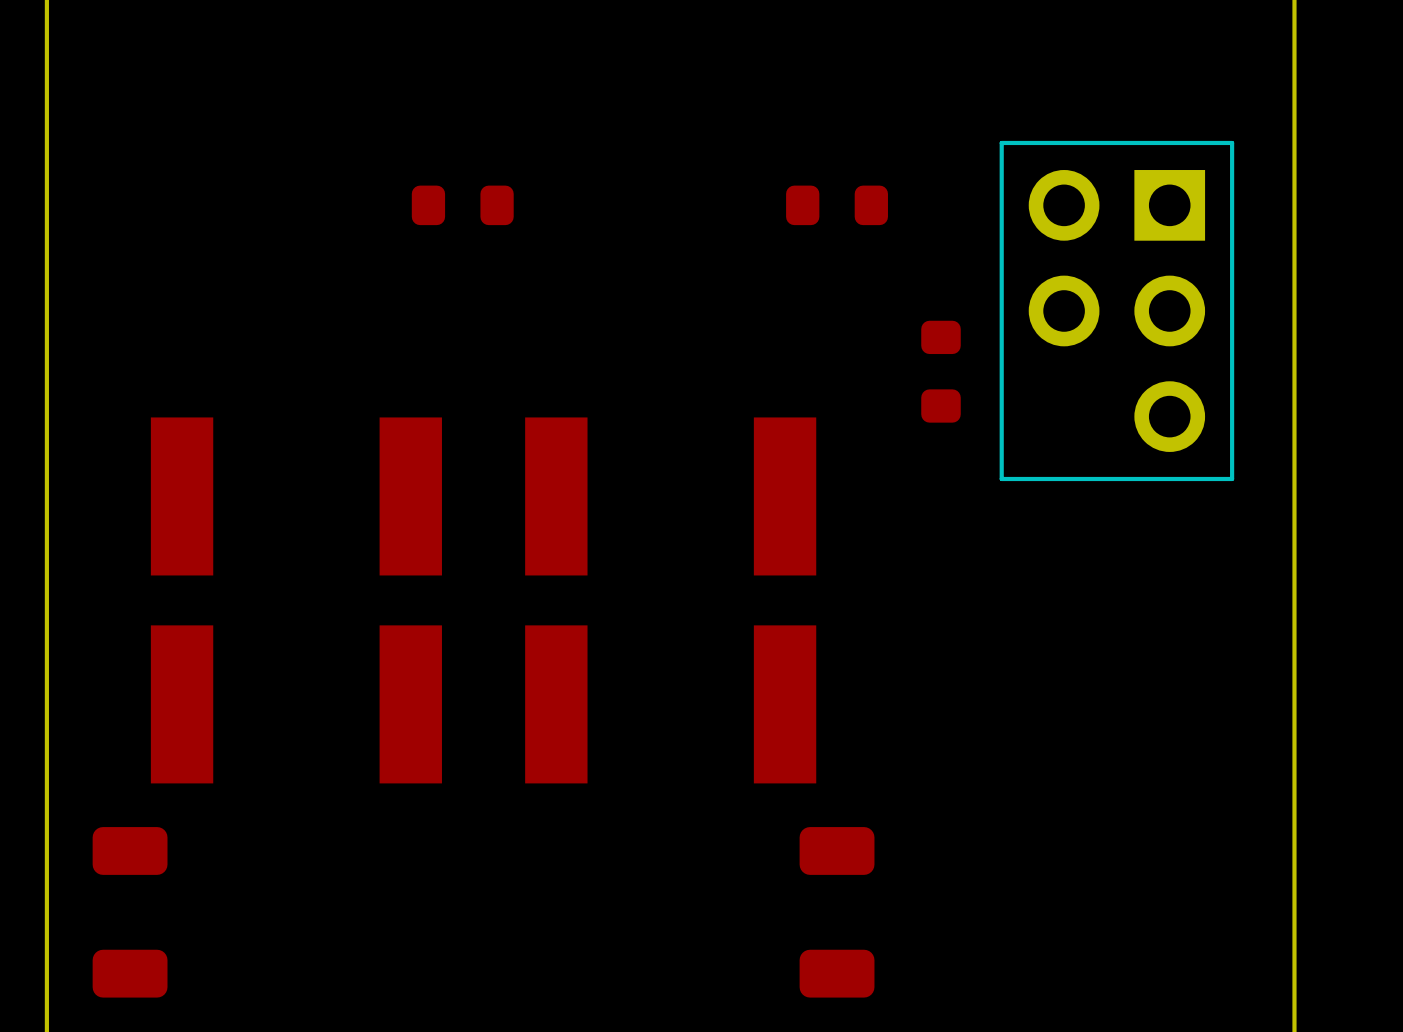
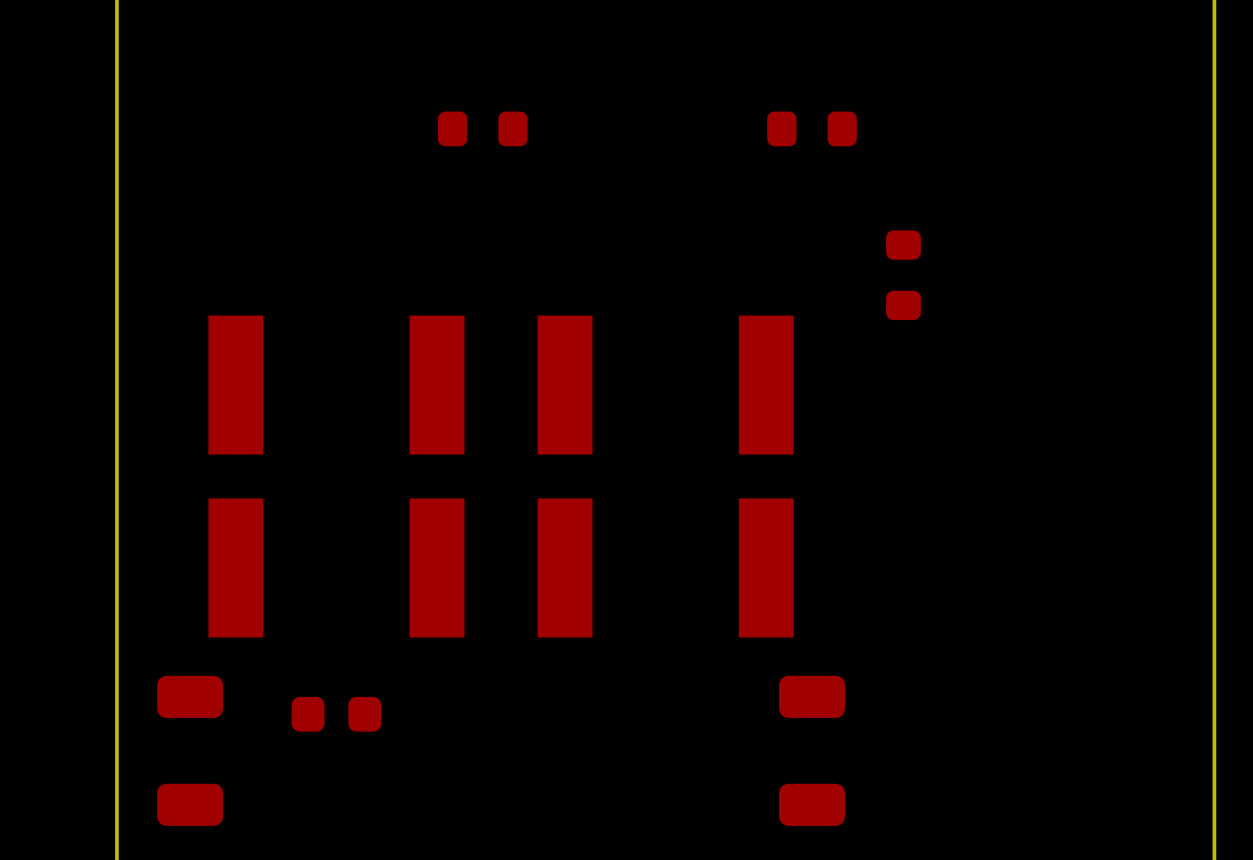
part: (1116, 310) -> none
part: none -> (336, 714)

